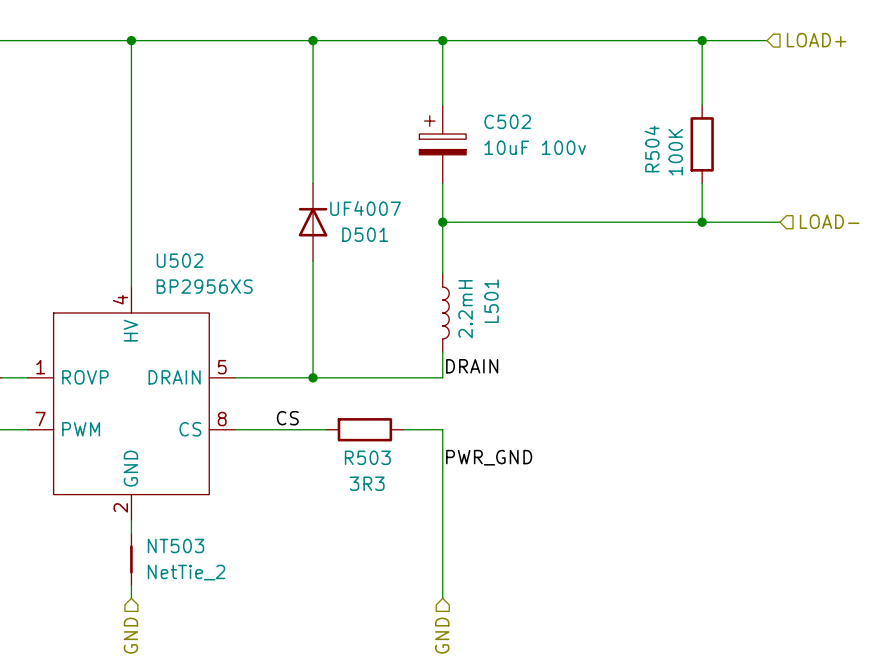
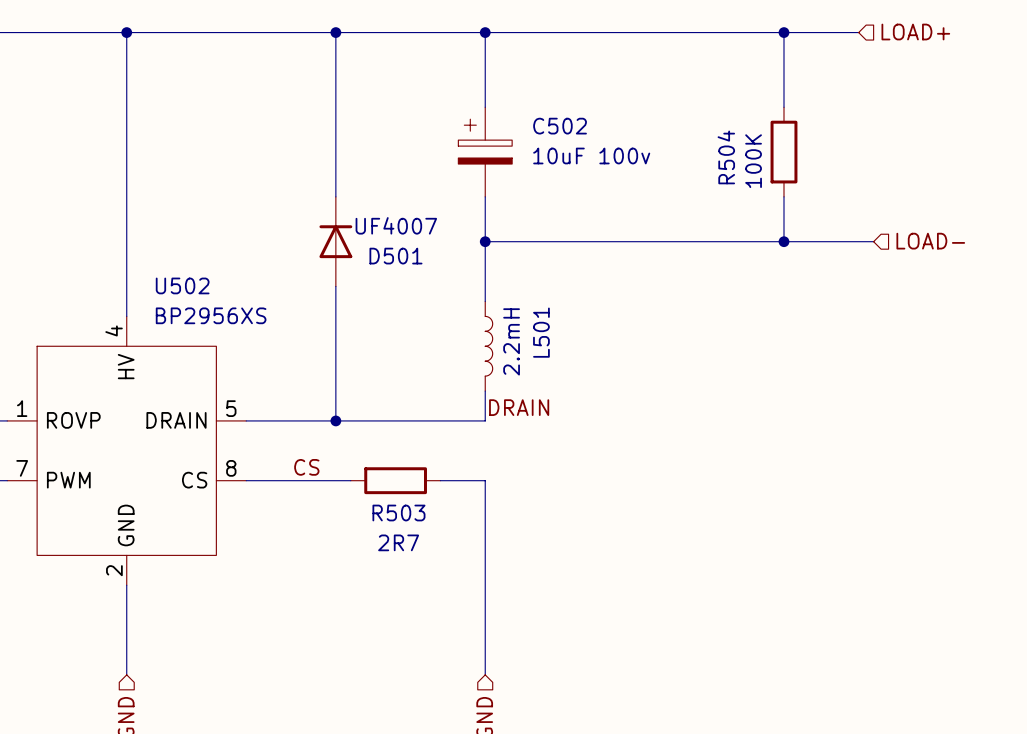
label: PWR_GND (489, 457) -> none
R503 value: 3R3 (367, 483) -> 2R7 (398, 542)
NT503: NetTie_2 (131, 559) -> none

